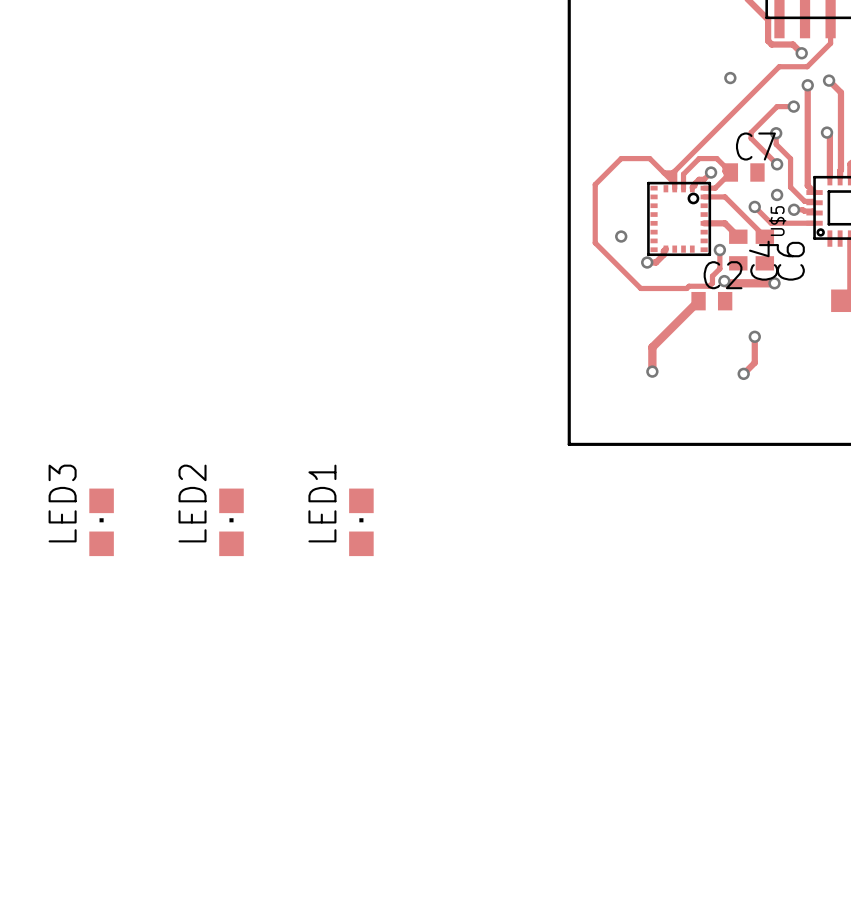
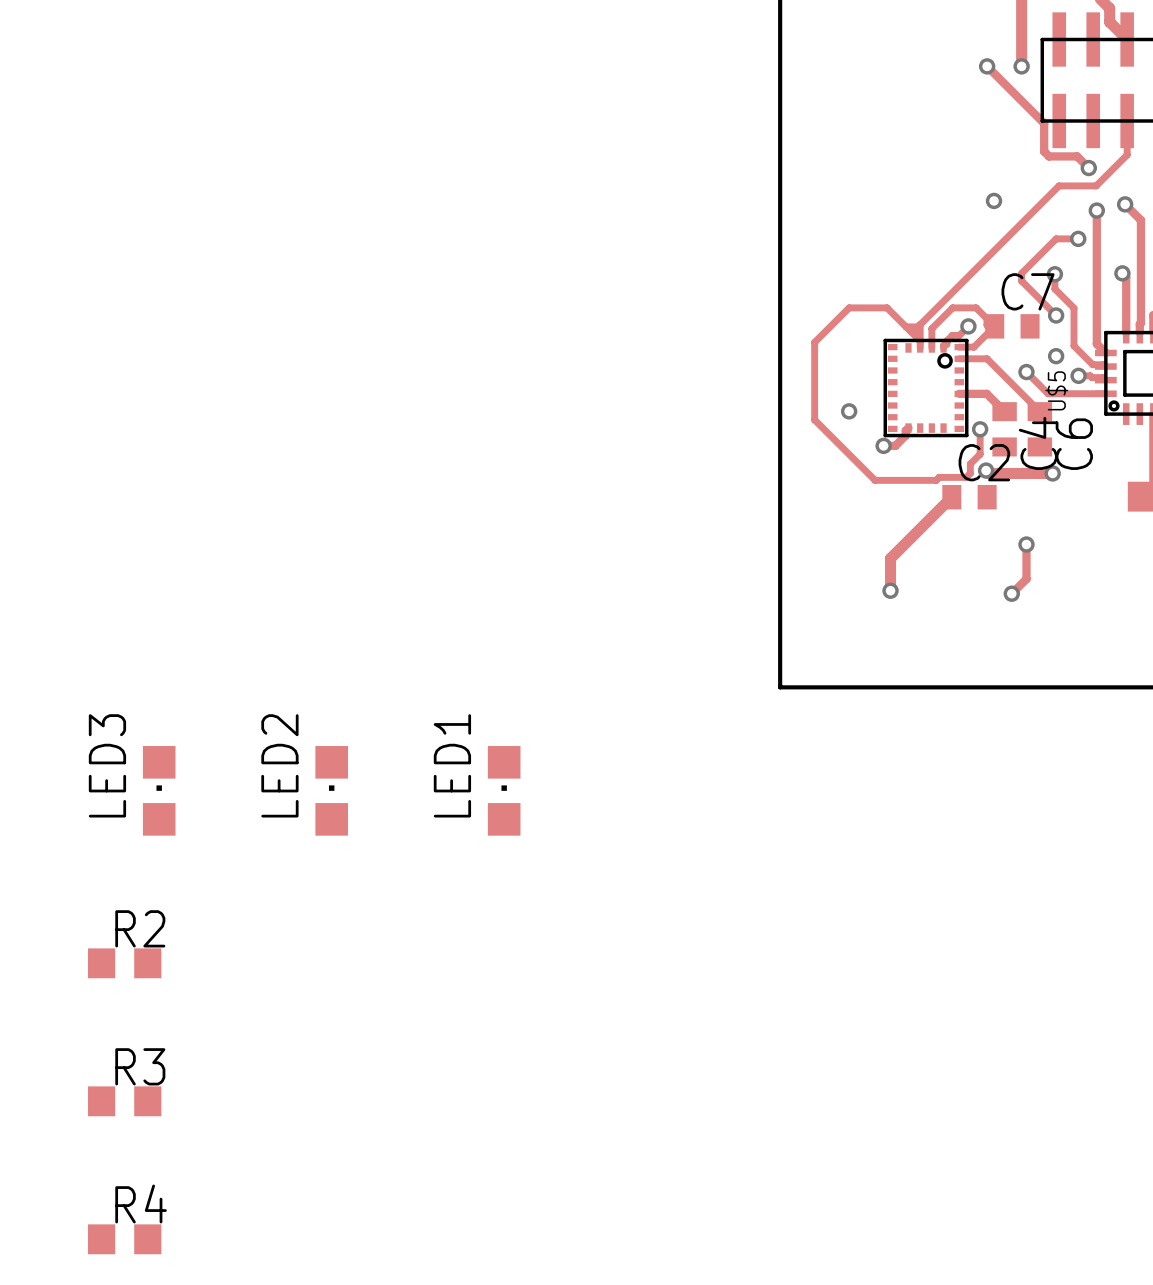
R2: none -> (124, 963)
R3: none -> (124, 1101)
R4: none -> (124, 1239)

